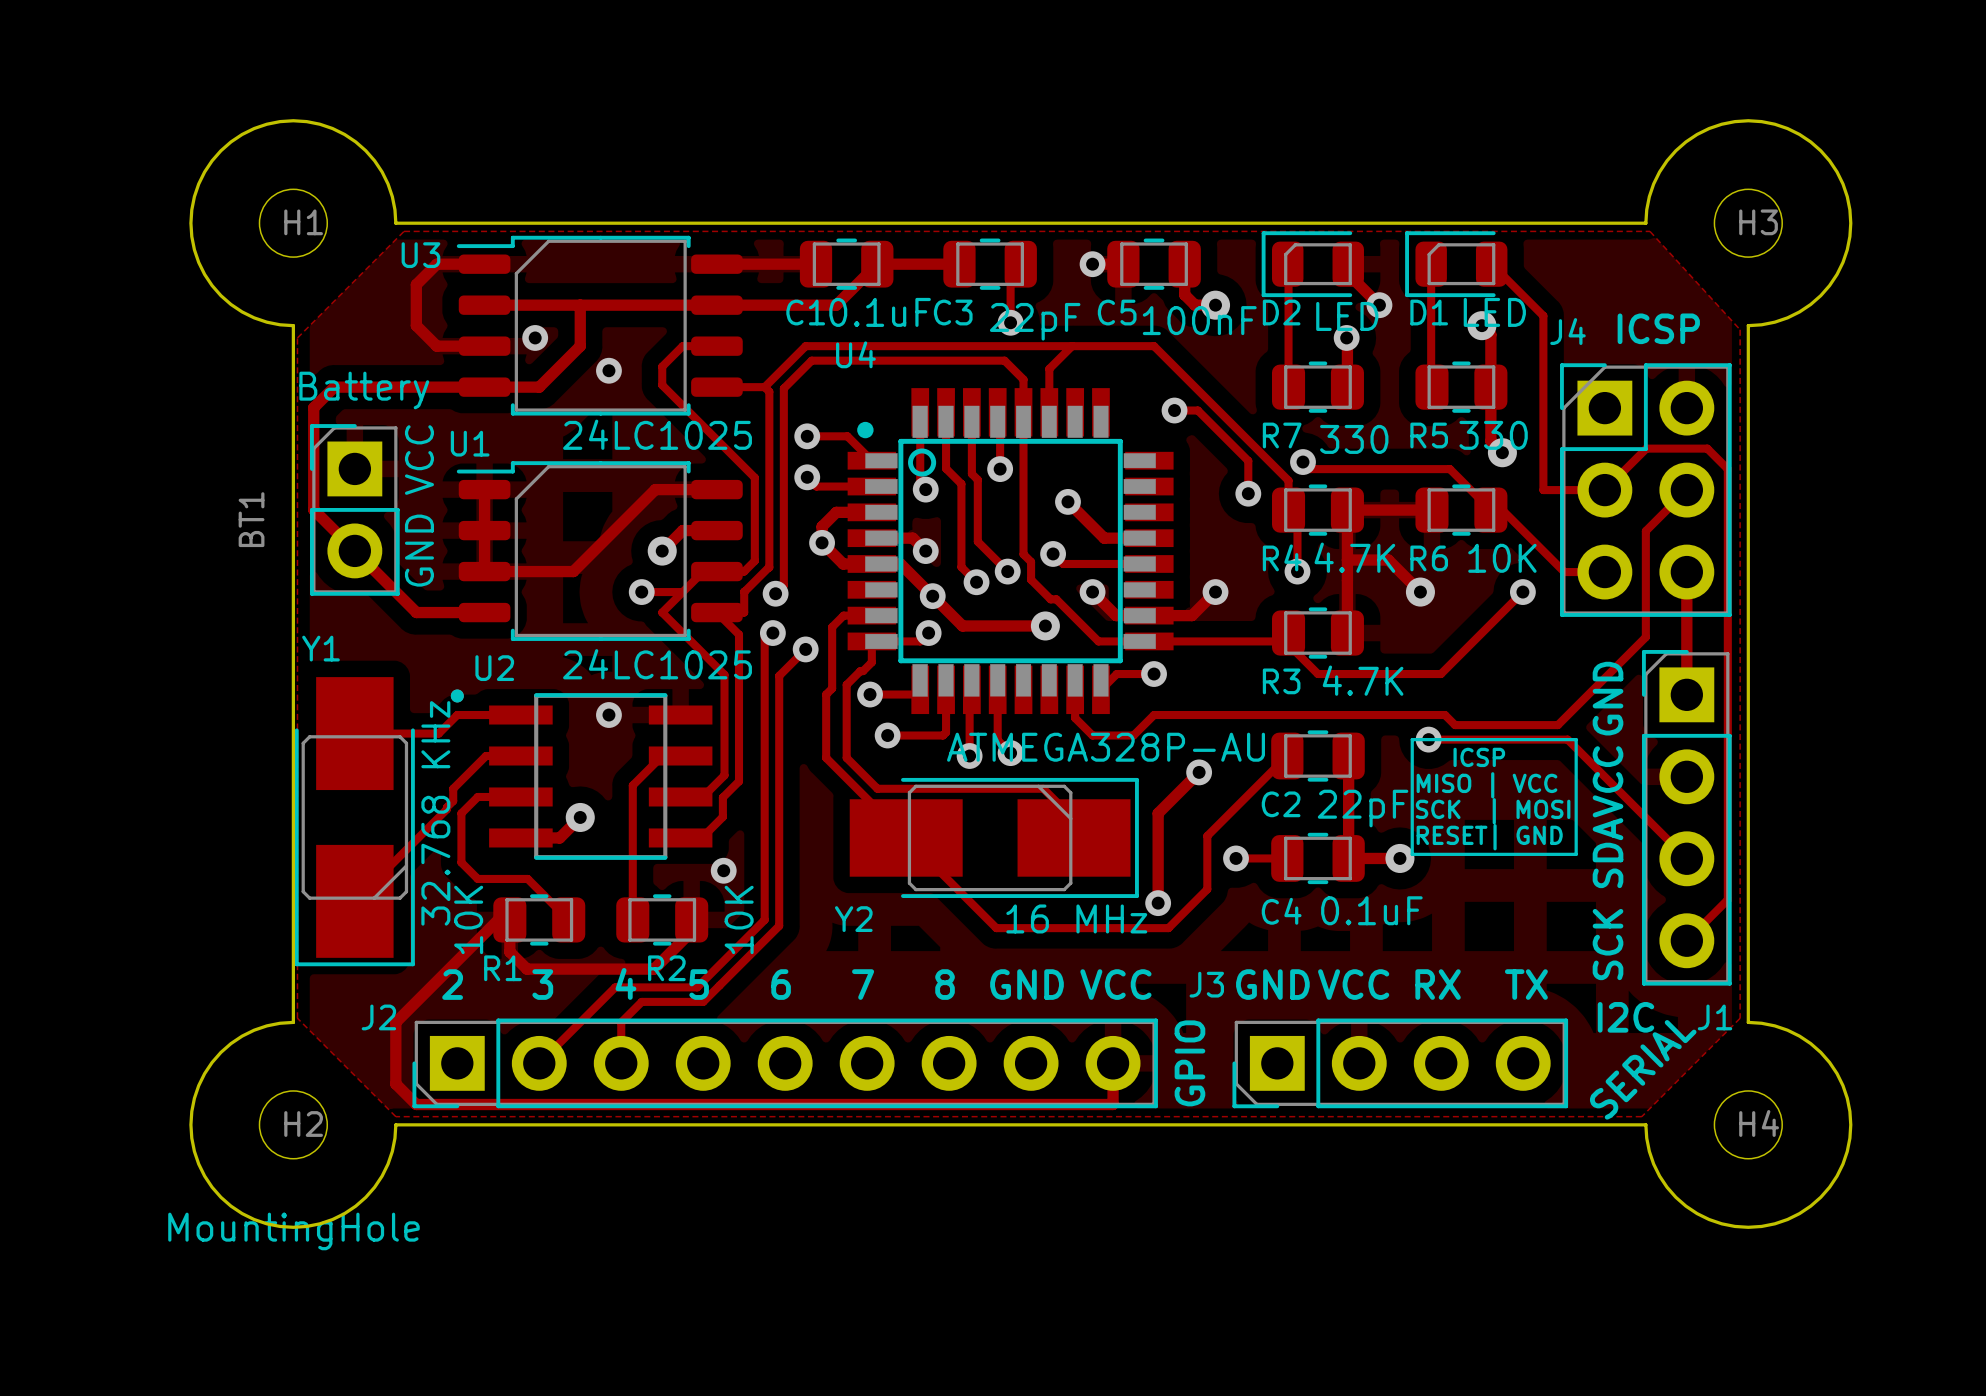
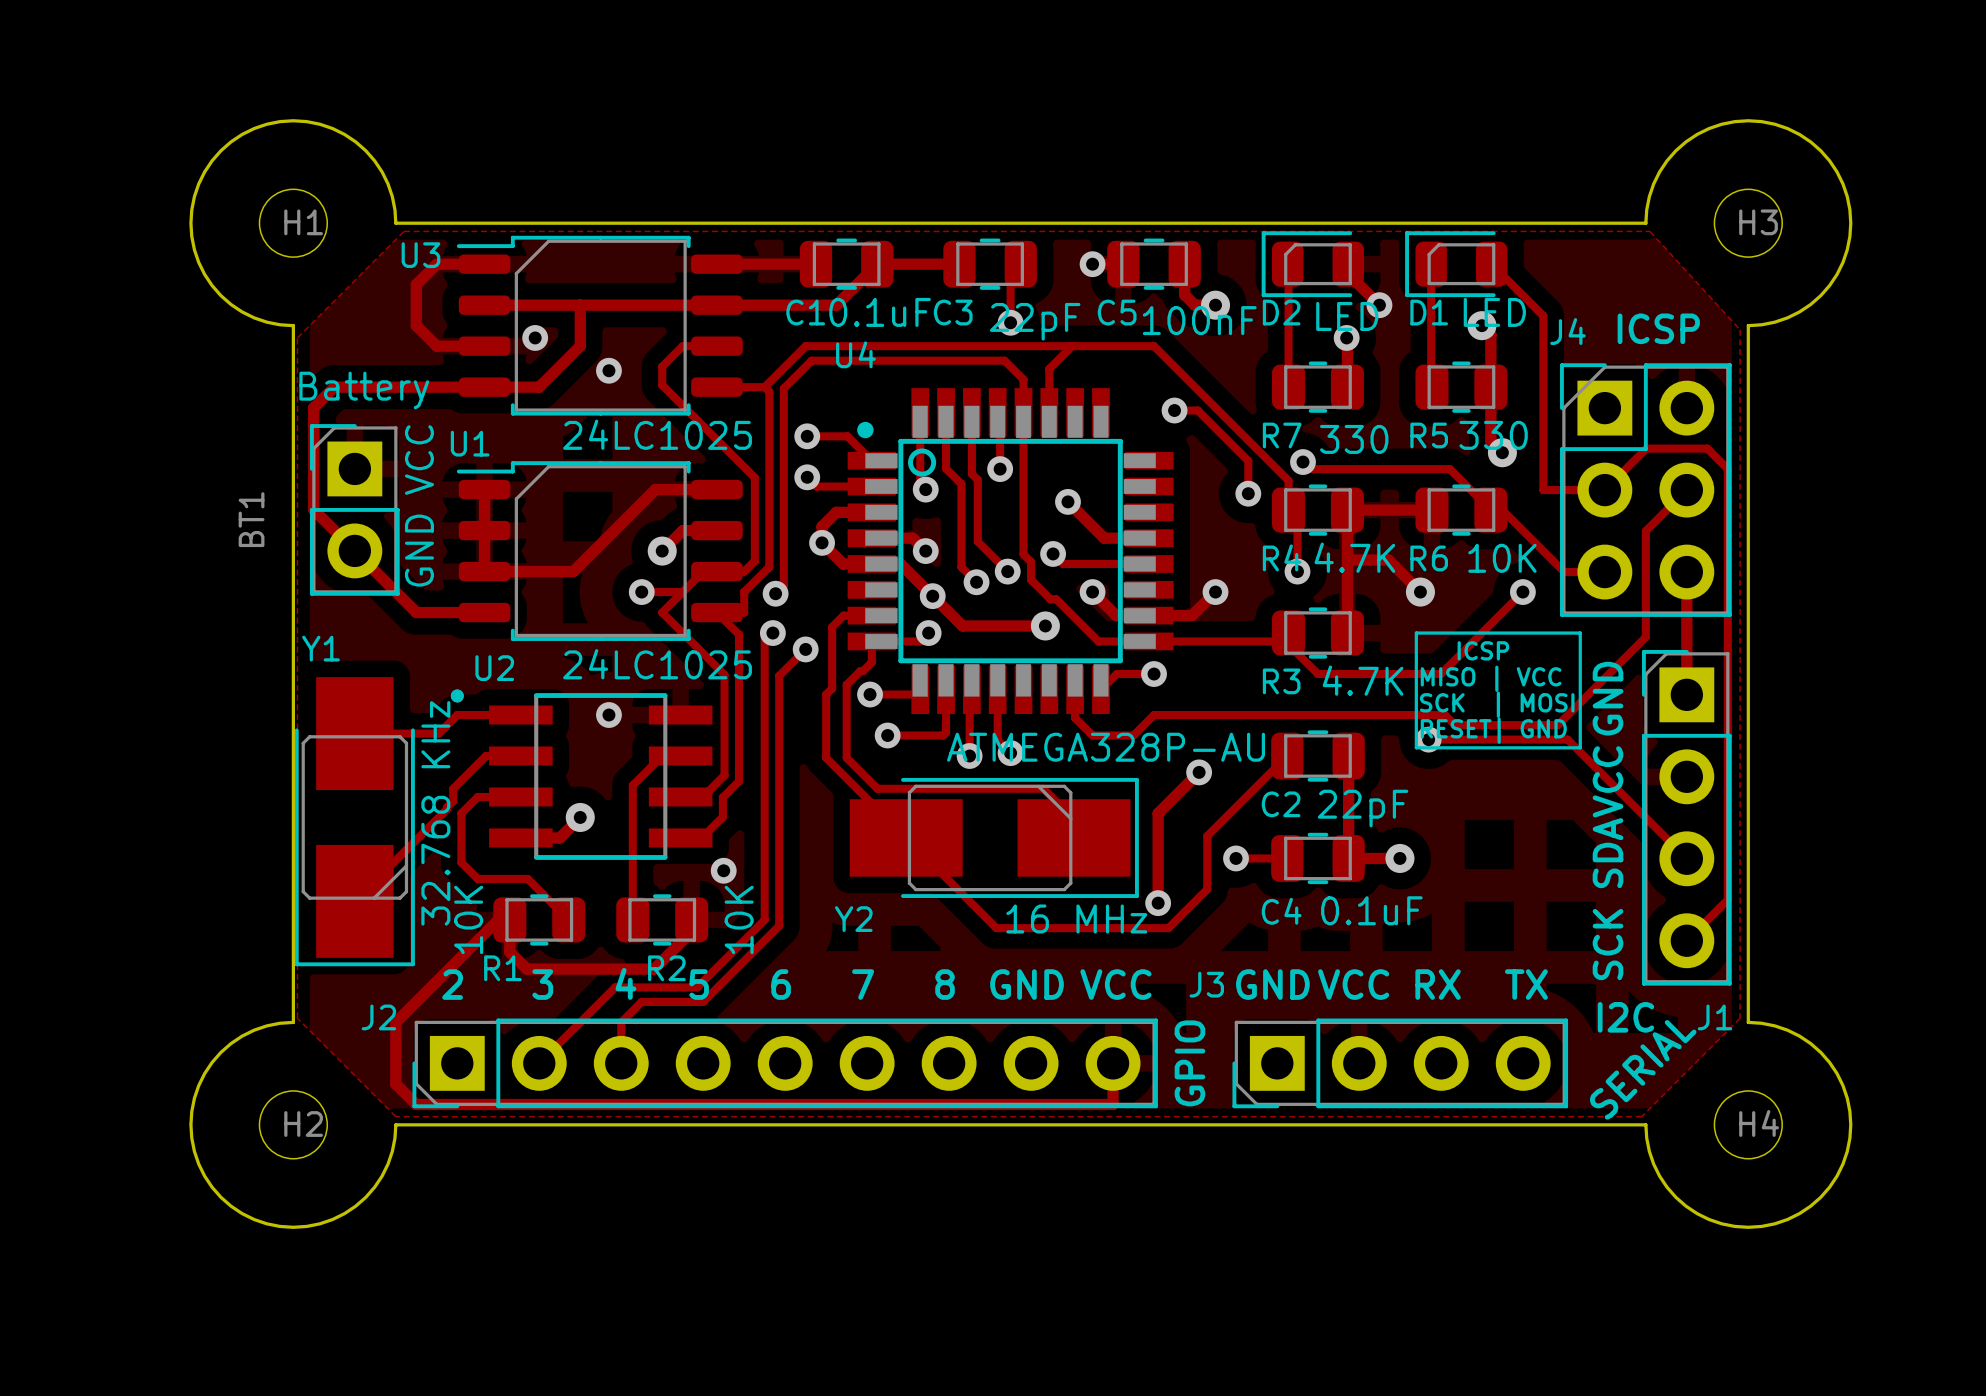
line: (1412, 739) (1576, 739) (1576, 854) (1412, 854) (1412, 739) -> (1416, 633) (1580, 633) (1580, 747) (1416, 747) (1416, 633)
text position: ICSP (1479, 757) -> ICSP (1483, 650)
text position: MISO | VCC (1486, 785) -> MISO | VCC (1491, 678)
text position: SCK | MOSI (1493, 811) -> SCK | MOSI (1497, 704)
text position: RESET| GND (1489, 837) -> RESET| GND (1493, 730)
H2 value: MountingHole (293, 1231) -> none

